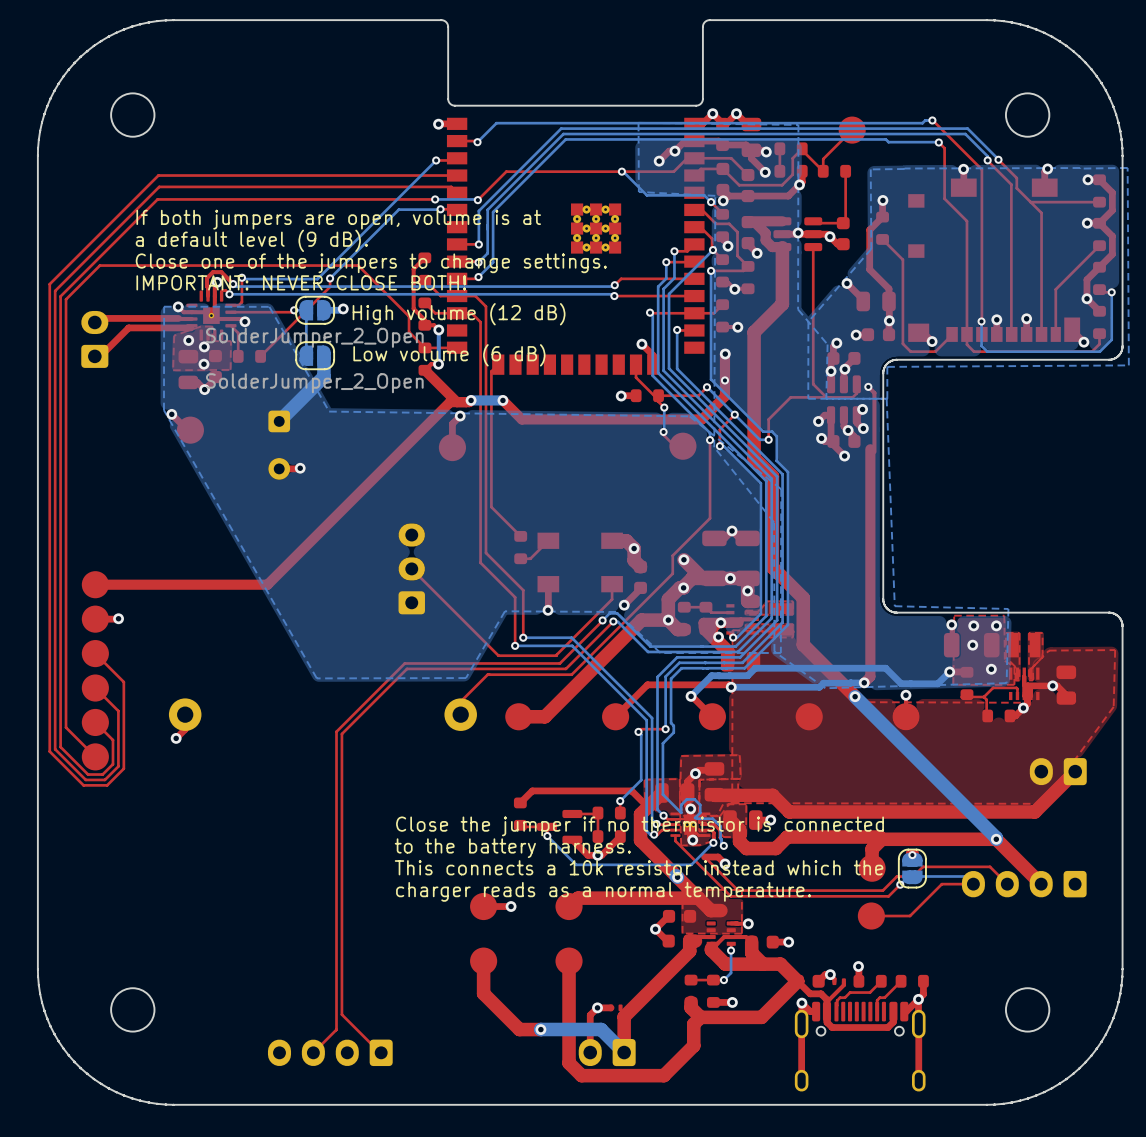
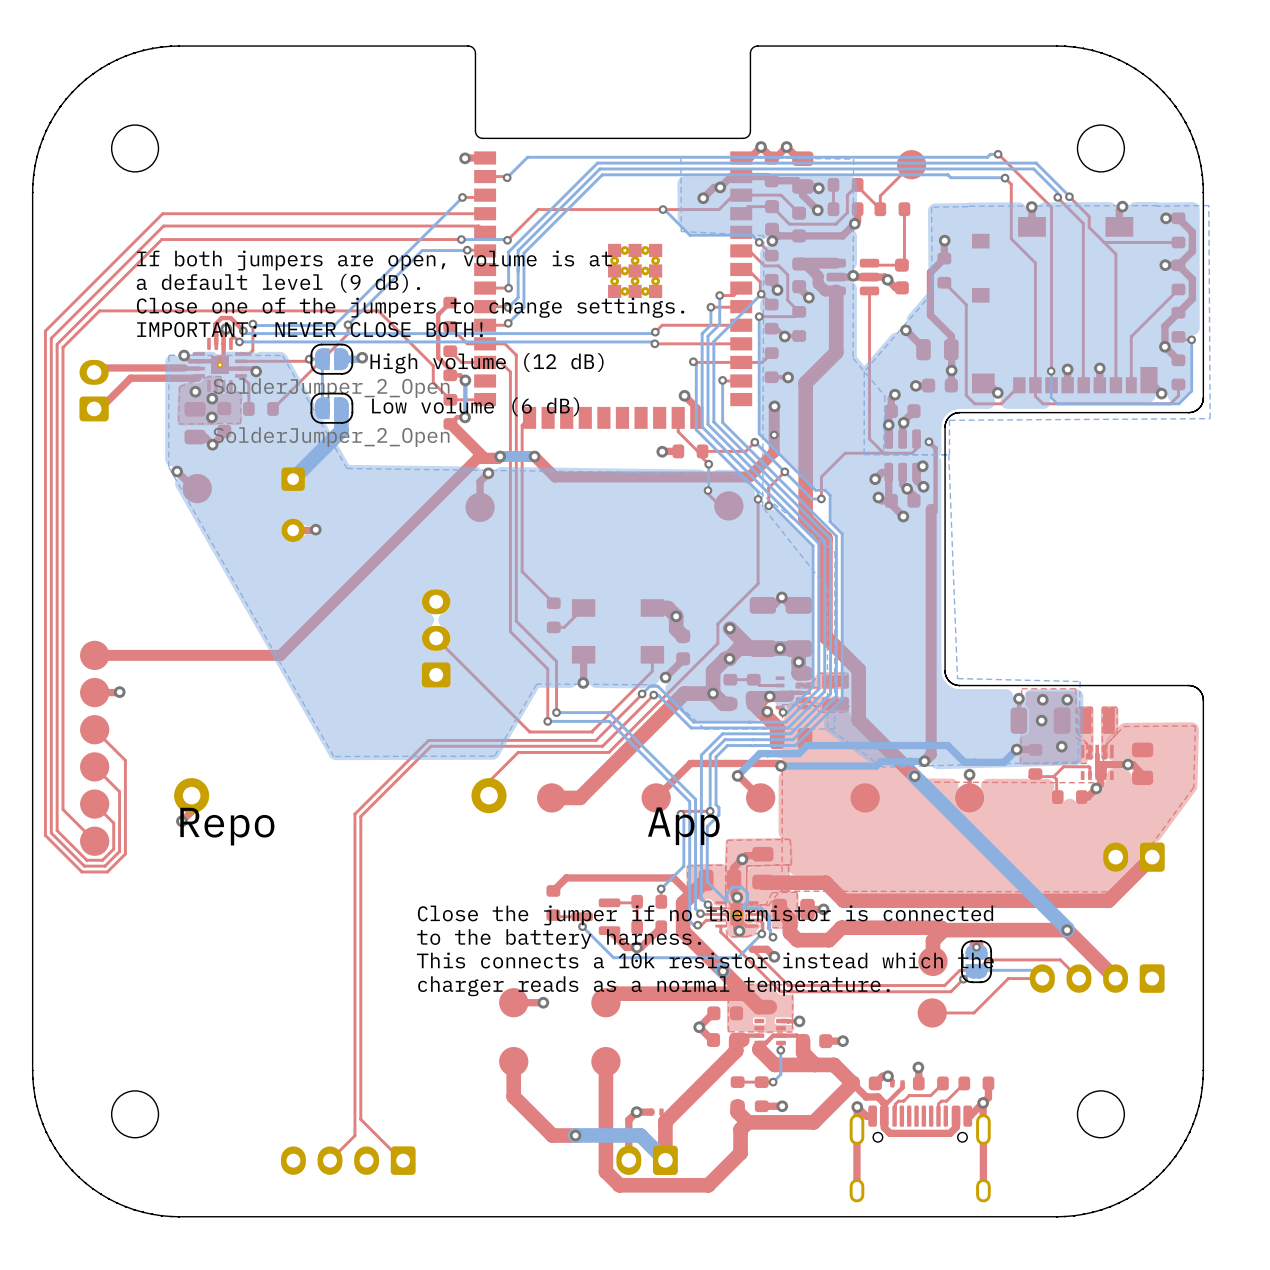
text: none -> App (683, 826)
text: none -> Repo (227, 826)

